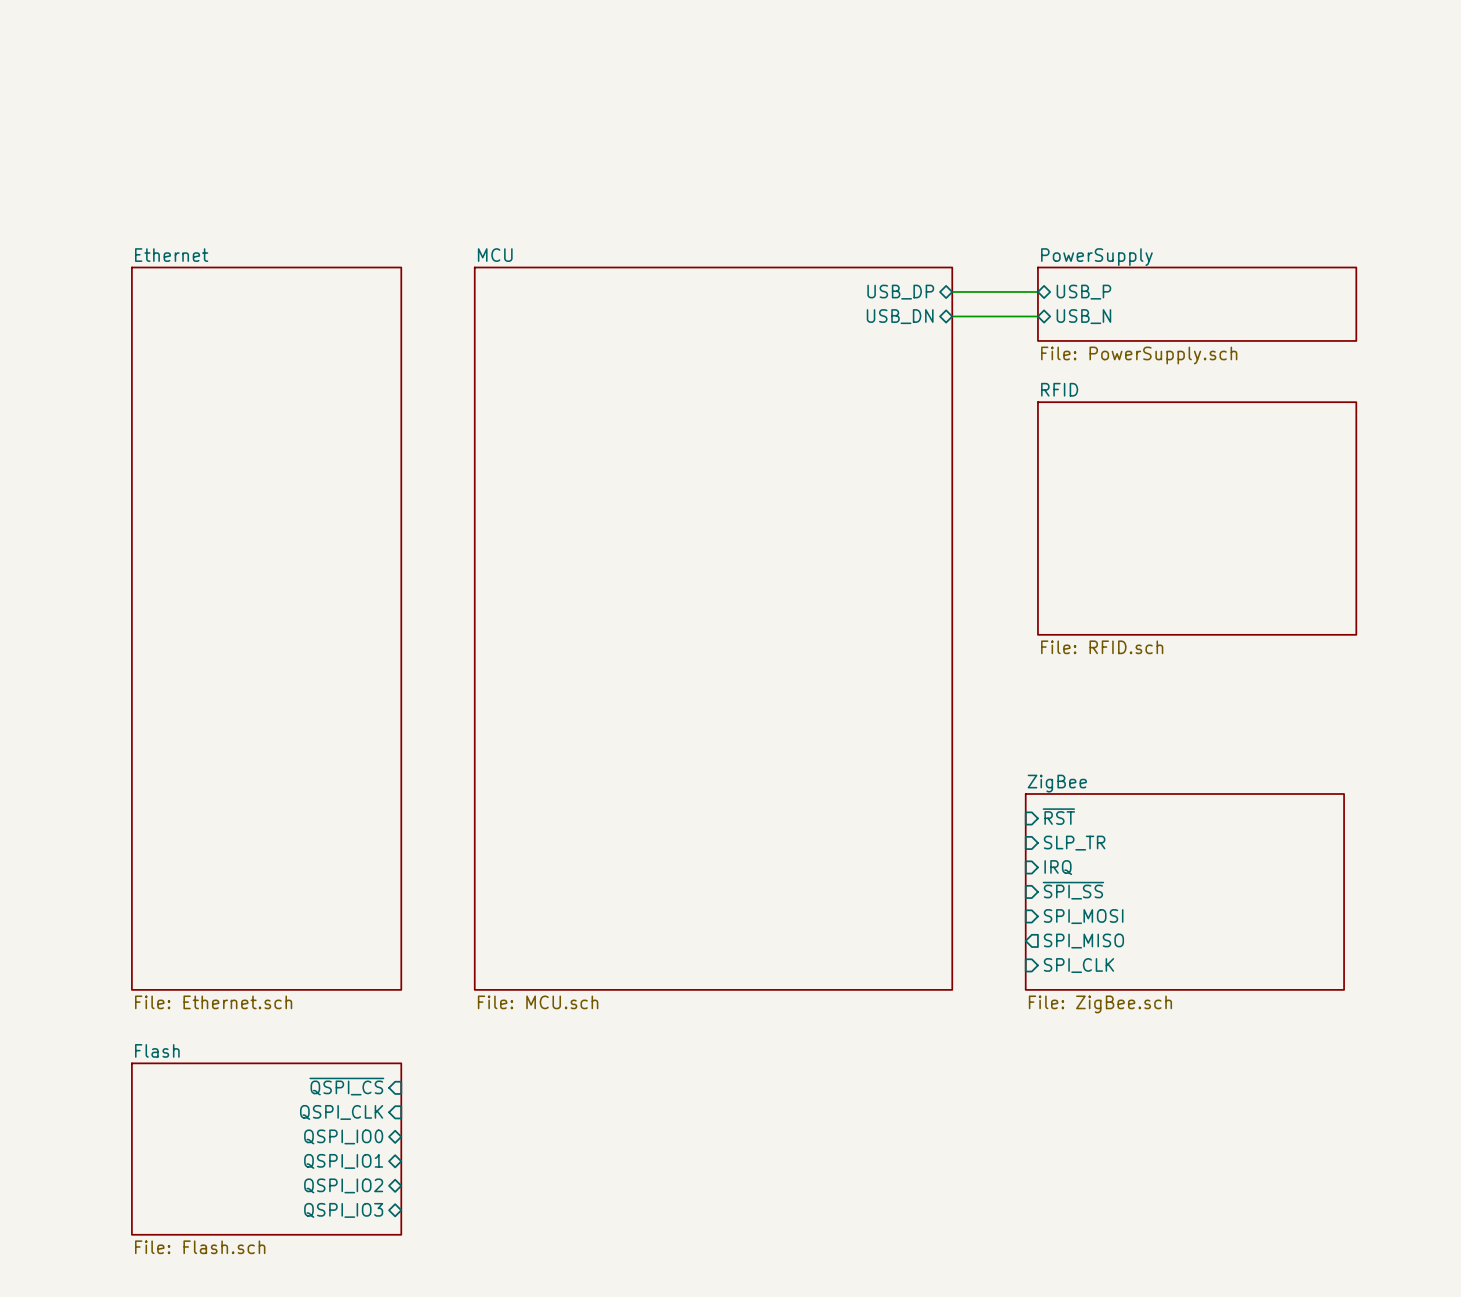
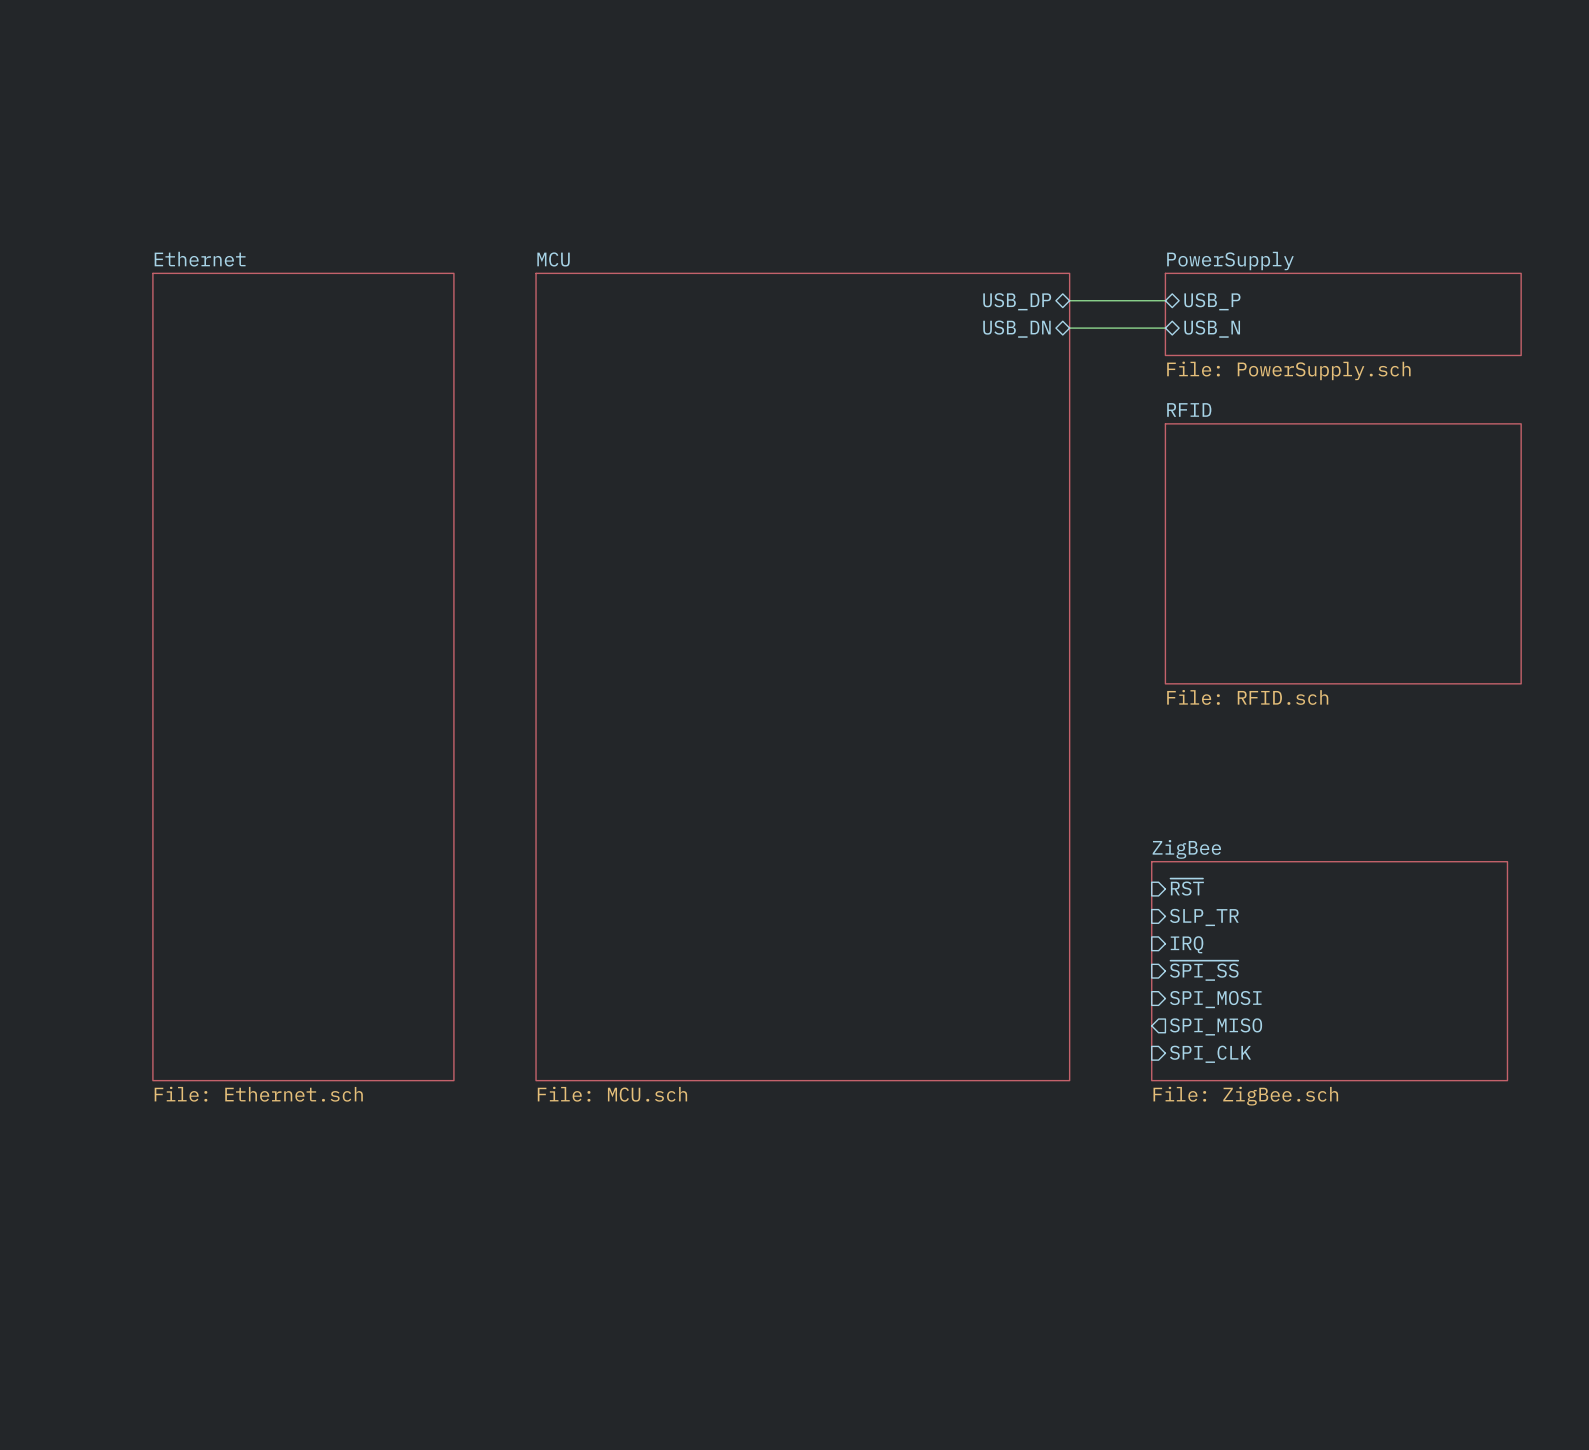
sheet pin: ~{QSPI_CS} (346, 1086) -> none
sheet pin: QSPI_CLK (341, 1112) -> none
sheet pin: QSPI_IO0 (343, 1136) -> none
sheet Flash: File: Flash.sch (266, 1149) -> none
sheet pin: QSPI_IO1 (343, 1161) -> none
sheet pin: QSPI_IO2 (343, 1185) -> none
sheet pin: QSPI_IO3 (343, 1210) -> none

